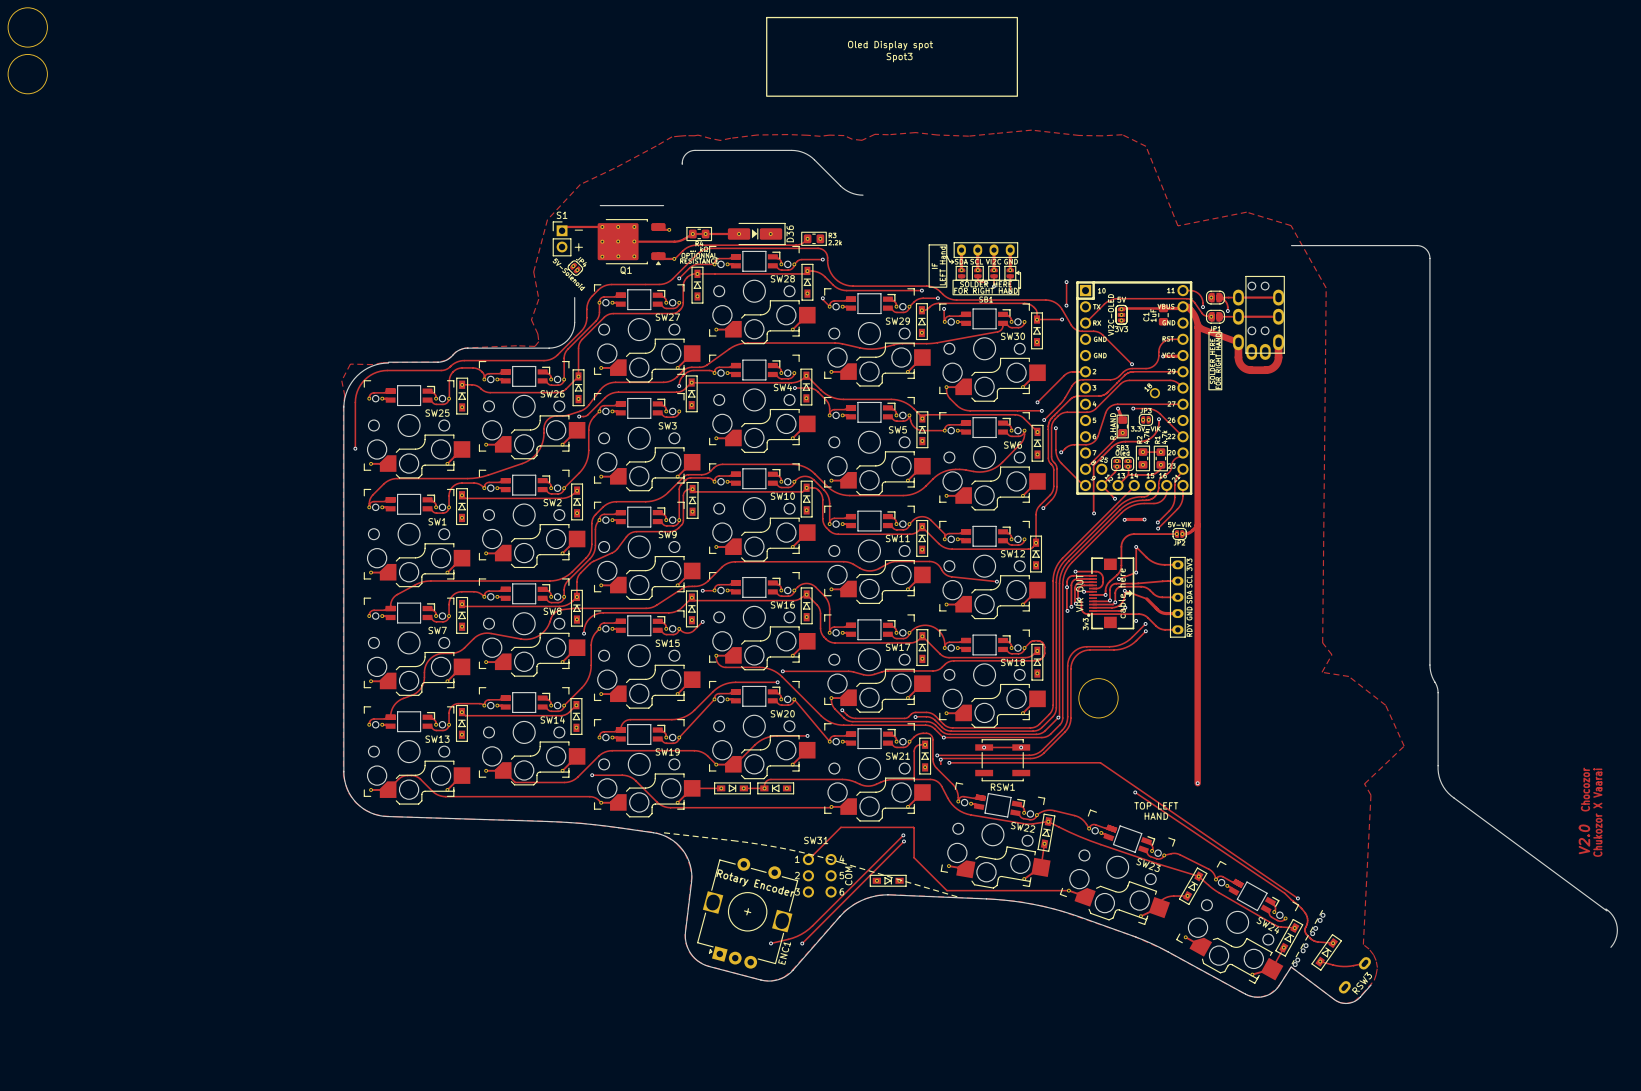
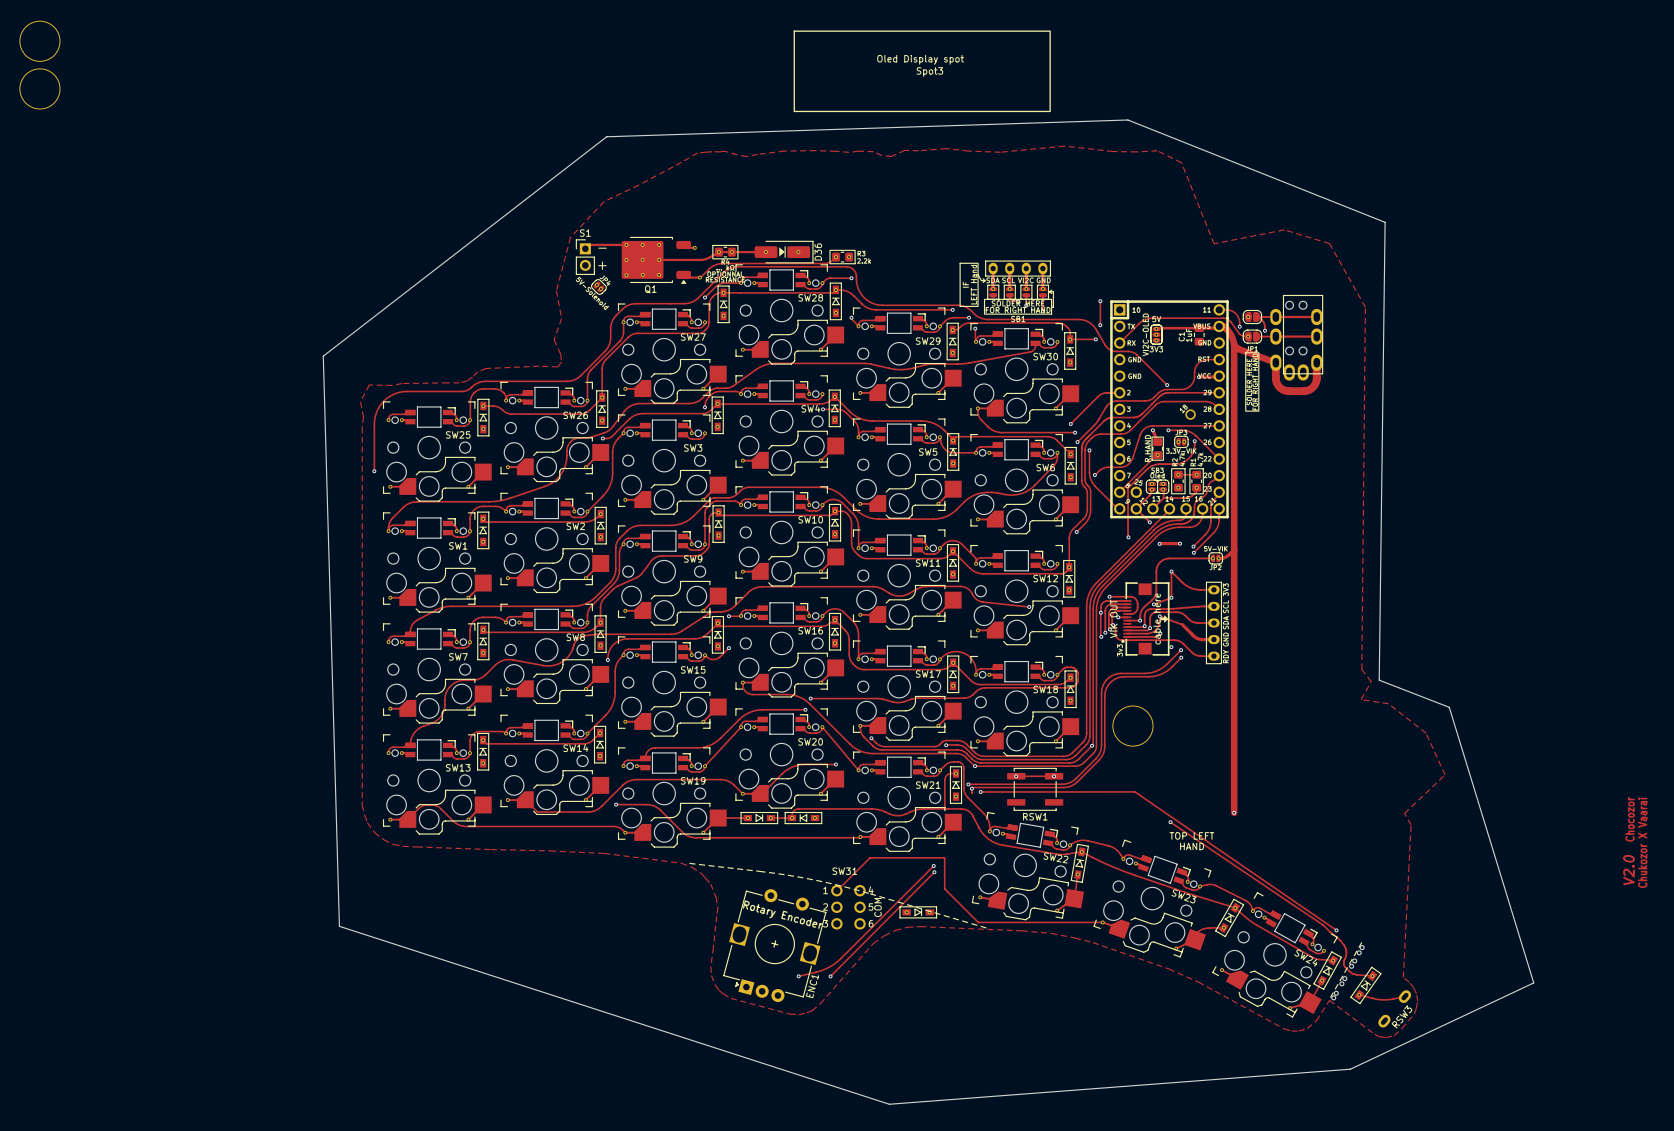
board edge: none -> (1127, 120) (606, 136) (323, 356) (339, 926) (889, 1104) (1350, 1069) (1533, 982) (1449, 707) (1379, 680) (1385, 222) (1127, 120)
board edge: (682, 164) (685, 155) (693, 150) (798, 151) (812, 157) (845, 189) (863, 195) -> none
board edge: (600, 205) (663, 205) -> none
board edge: (1291, 245) (1417, 245) (1423, 247) (1428, 253) (1429, 665) (1438, 690) (1439, 776) (1443, 787) (1451, 795) (1606, 910) -> none
board edge: (574, 297) (573, 329) (567, 340) (558, 346) (549, 348) (465, 348) (457, 350) (442, 361) (388, 362) -> none
board edge: (388, 362) (371, 366) (357, 375) (347, 390) (343, 406) (343, 771) (348, 792) (363, 808) (382, 816) (570, 822) (653, 832) (665, 836) (682, 849) (691, 869) (685, 934) (686, 944) (690, 953) (697, 960) (706, 965) (764, 980) (778, 979) (790, 972) (849, 907) (865, 898) (887, 894) (1005, 900) (1062, 911) (1152, 943) (1245, 994) (1254, 997) (1264, 996) (1275, 990) (1291, 967) (1340, 1002) (1350, 1003) (1356, 1000) (1371, 984) -> none
board edge: (1605, 908) (1614, 918) (1617, 927) (1616, 936) (1610, 947) -> none

